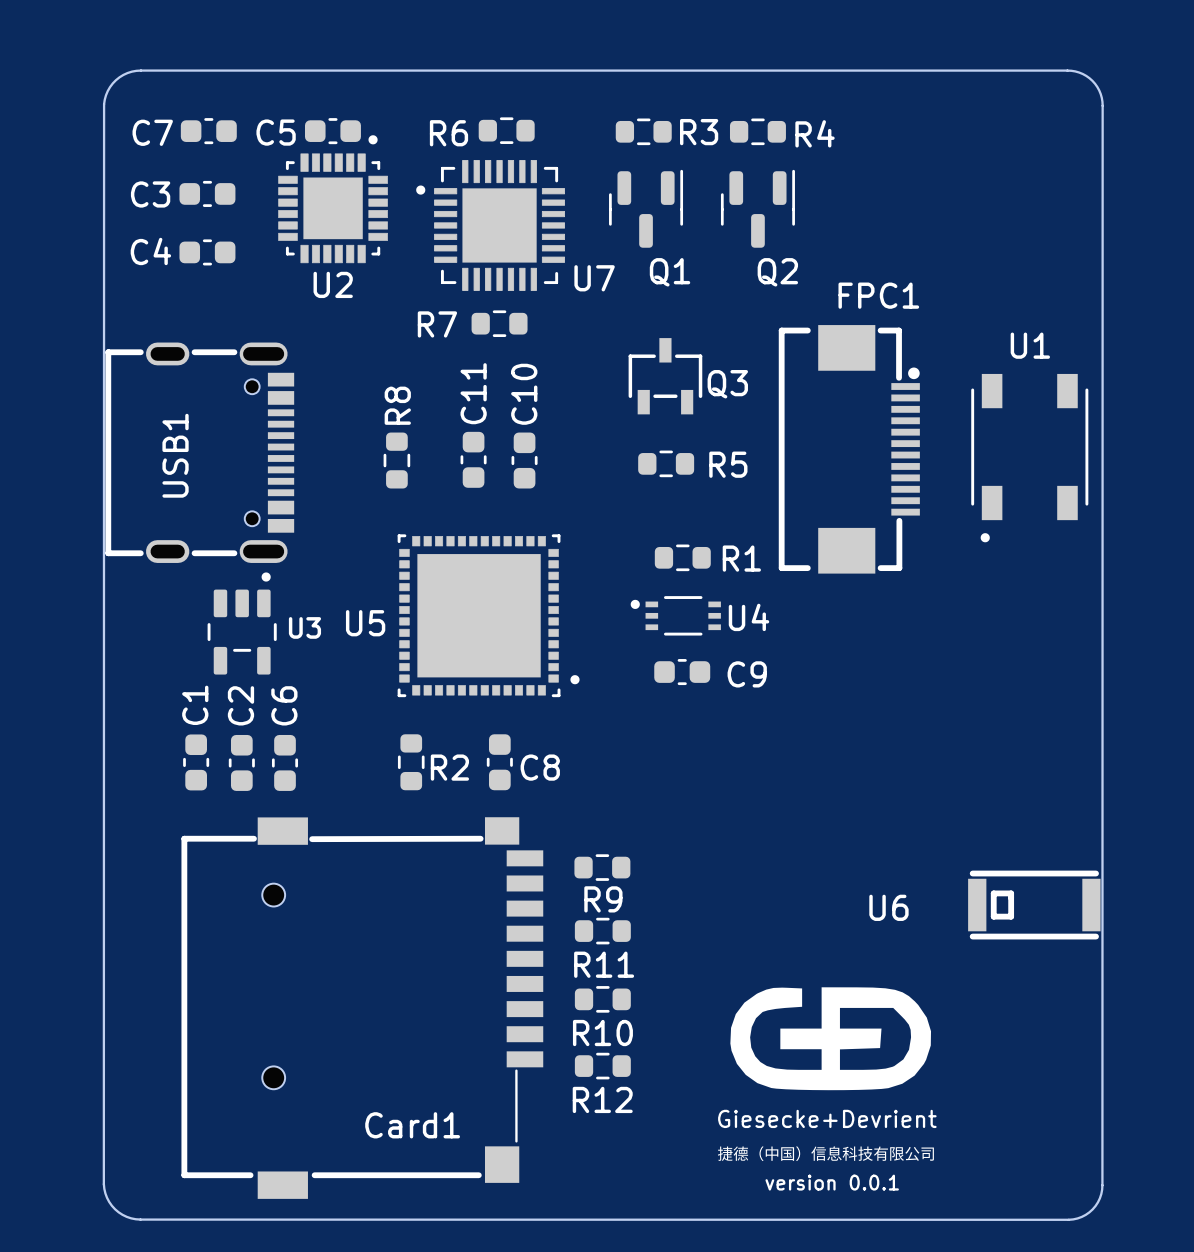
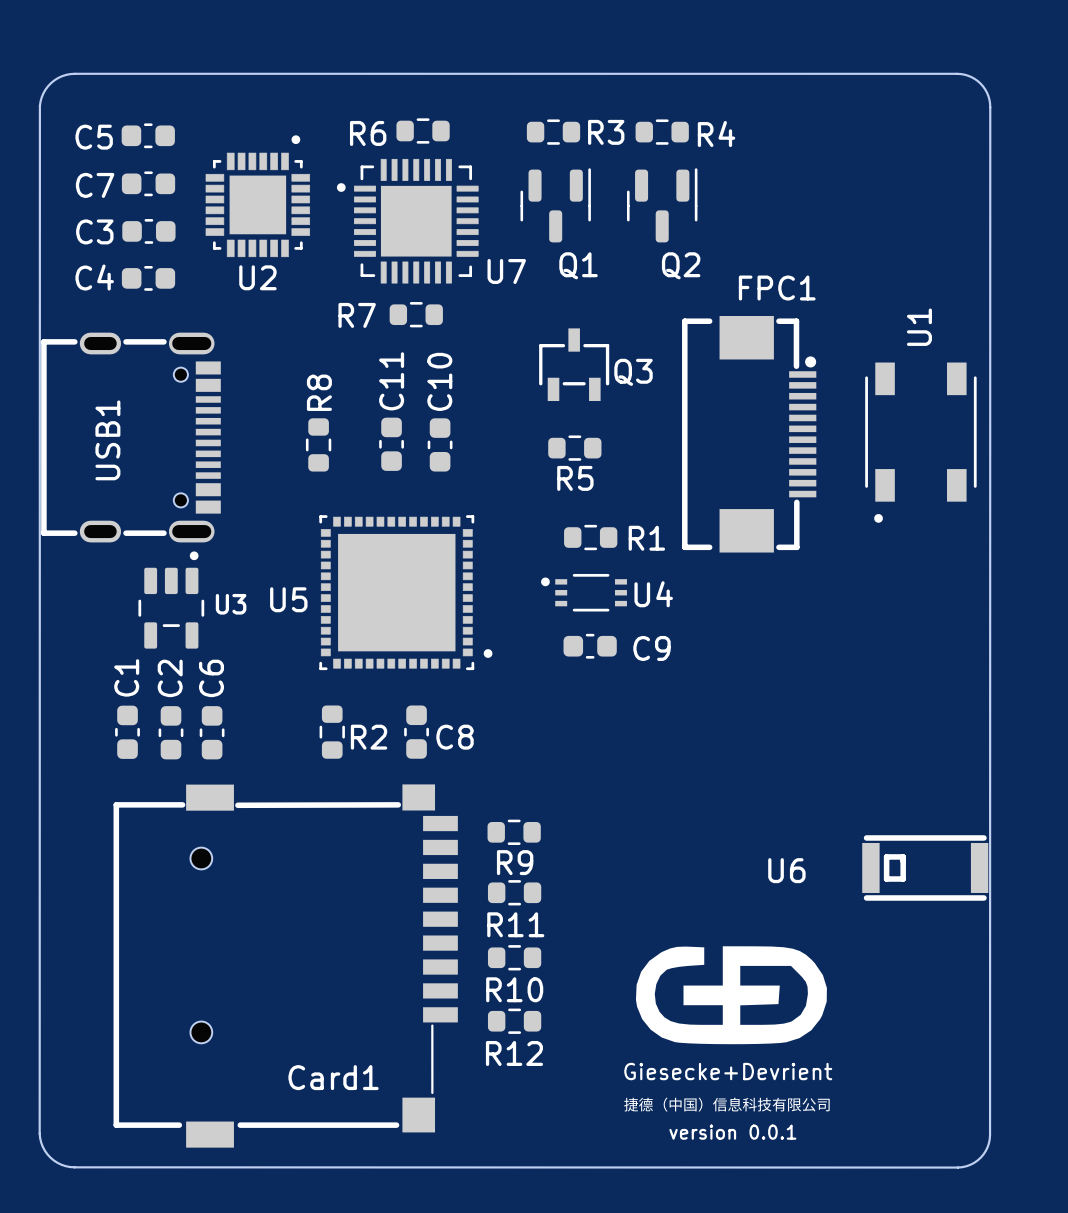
C7 position: (208, 131) -> (148, 183)
C5 position: (332, 131) -> (148, 135)
C3 position: (207, 193) -> (148, 231)
C4 position: (207, 252) -> (148, 278)
U1 name rotation: 0° (1030, 345) -> 90° counterclockwise (919, 327)
R5 name position: R5 (728, 464) -> R5 (575, 478)

